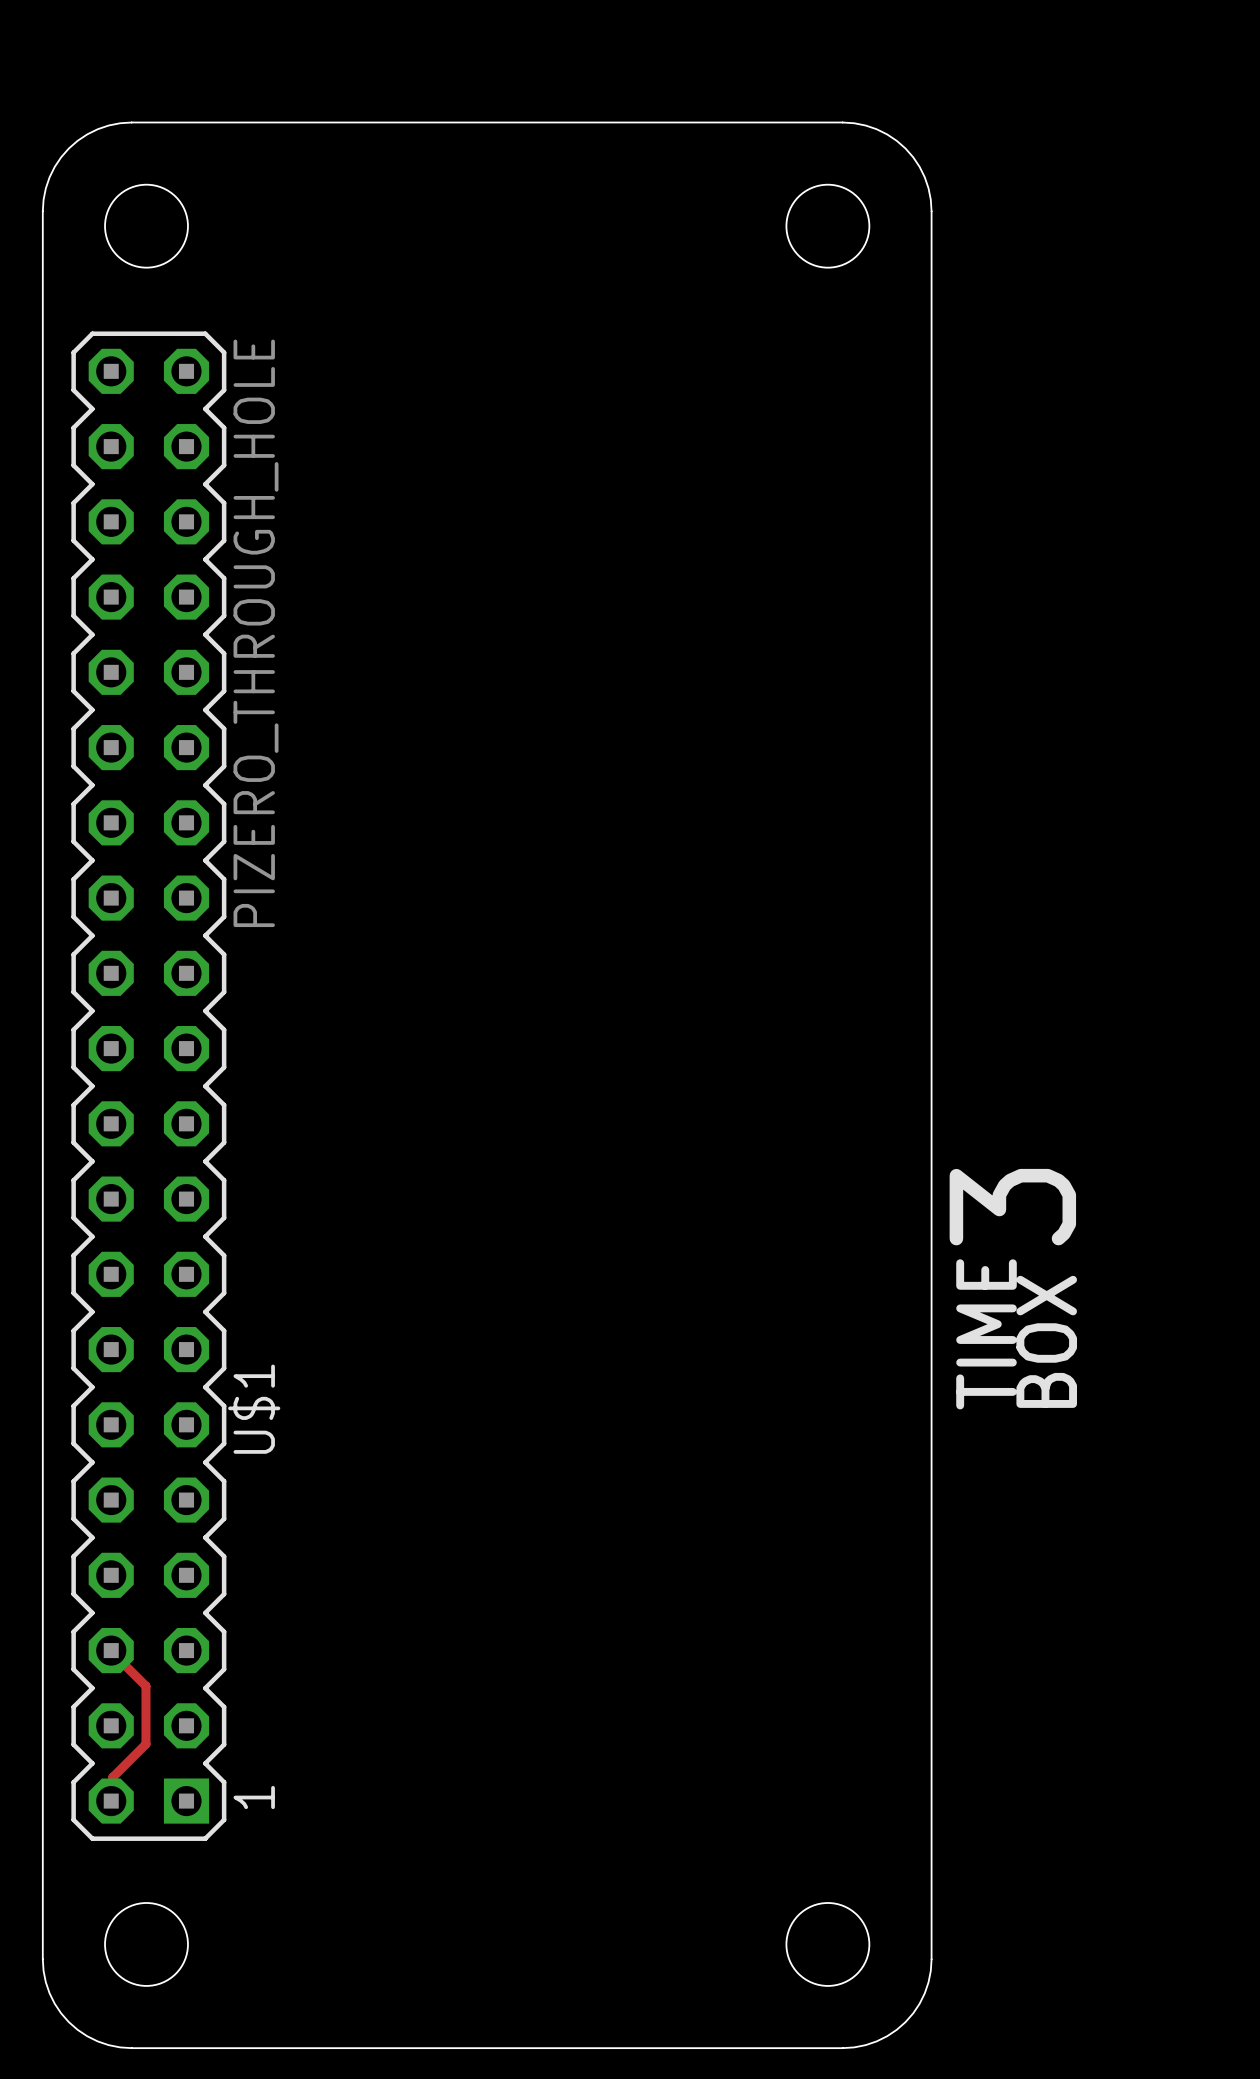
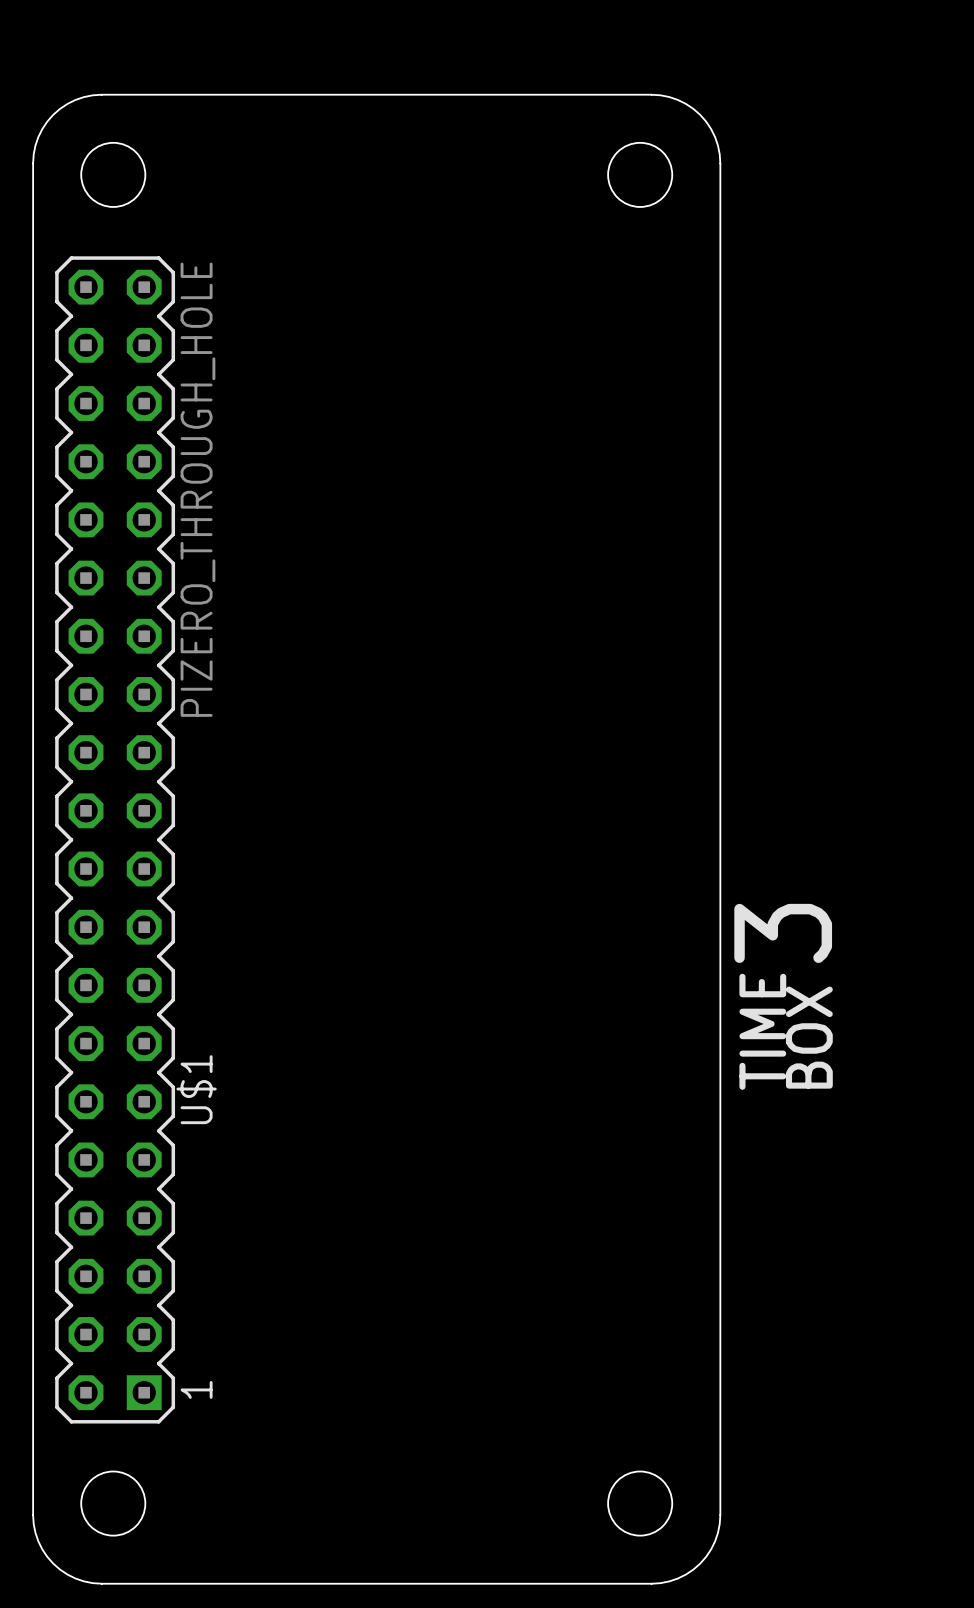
track: (111, 1650) (145, 1686) (145, 1744) (112, 1777) (111, 1801) -> none

